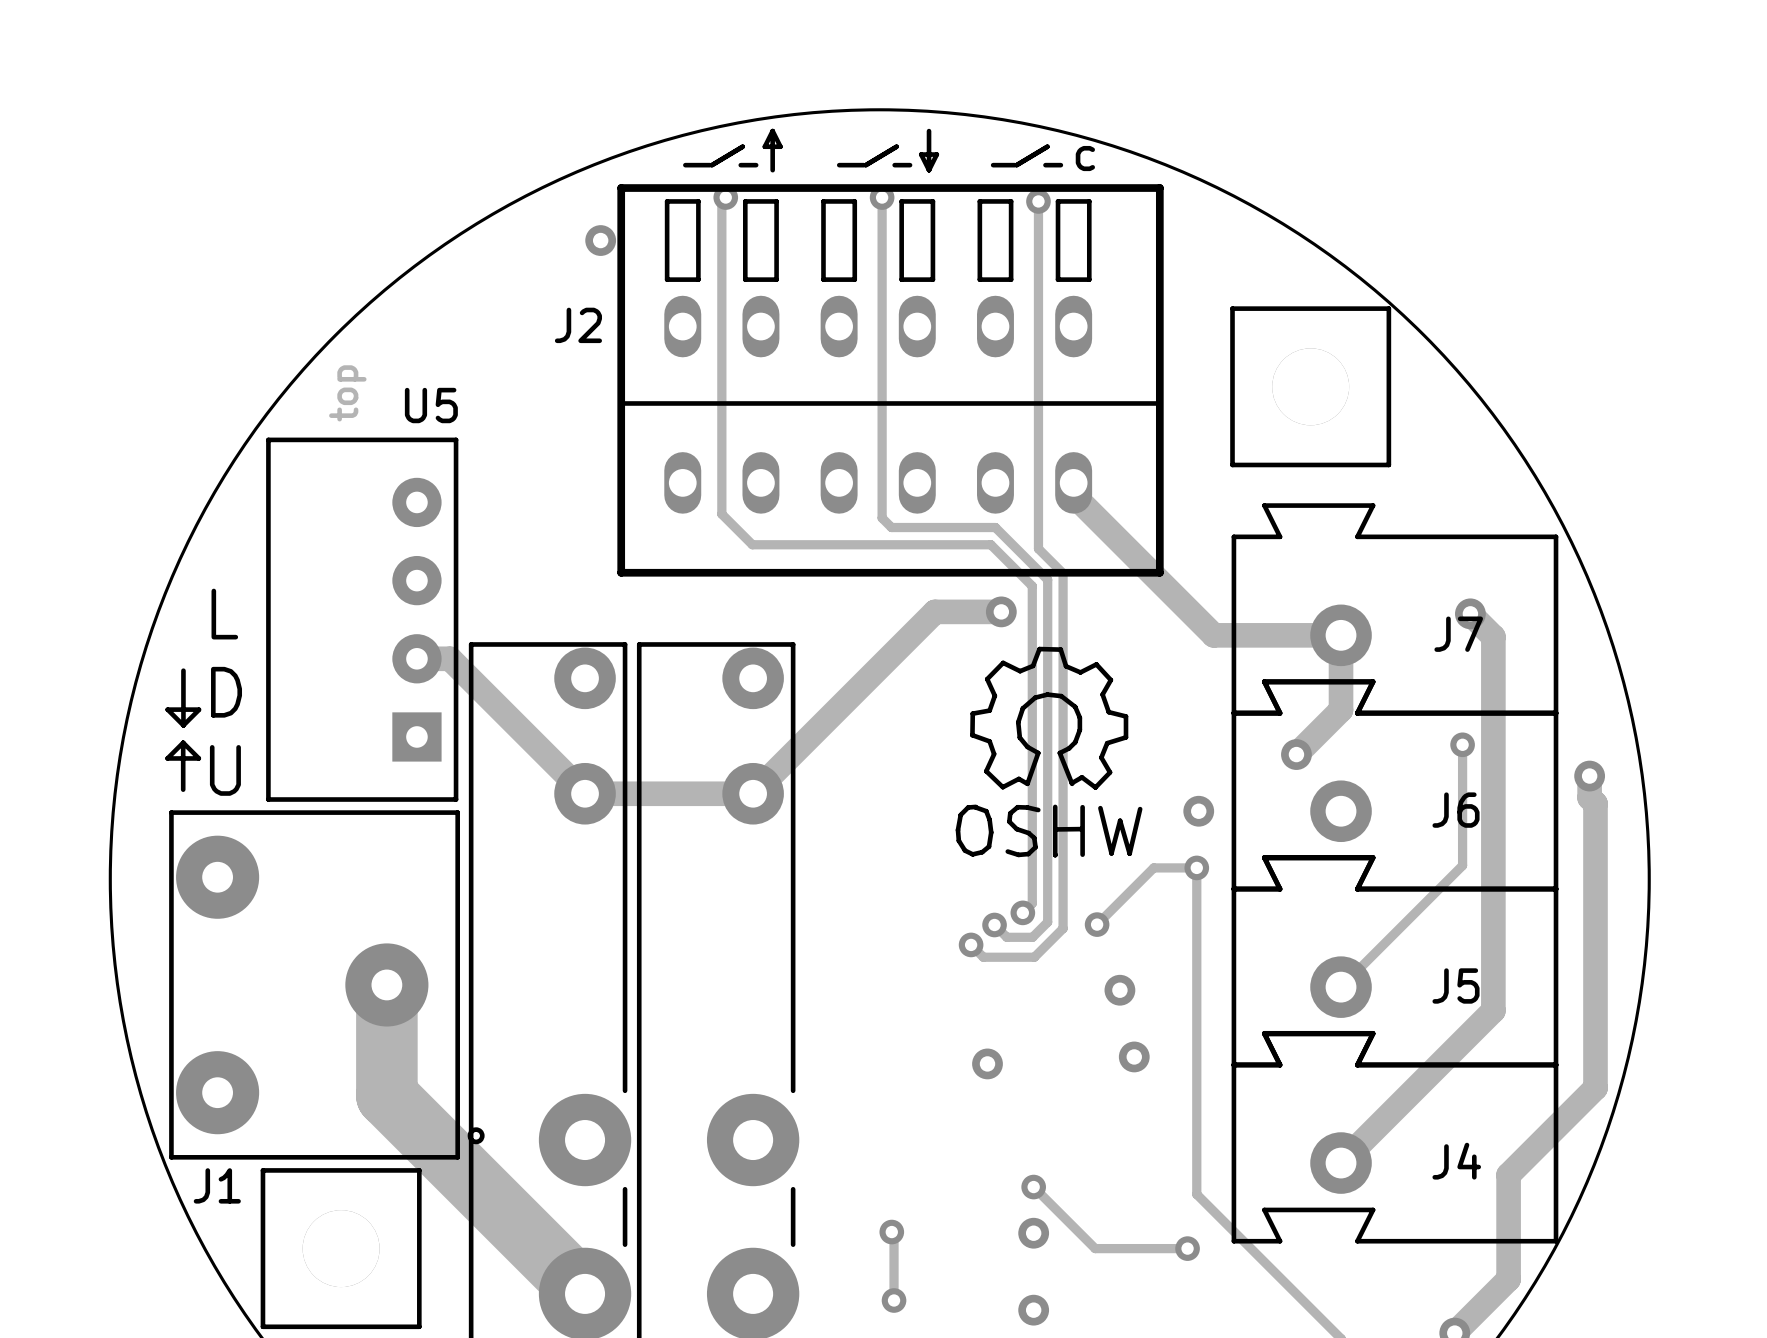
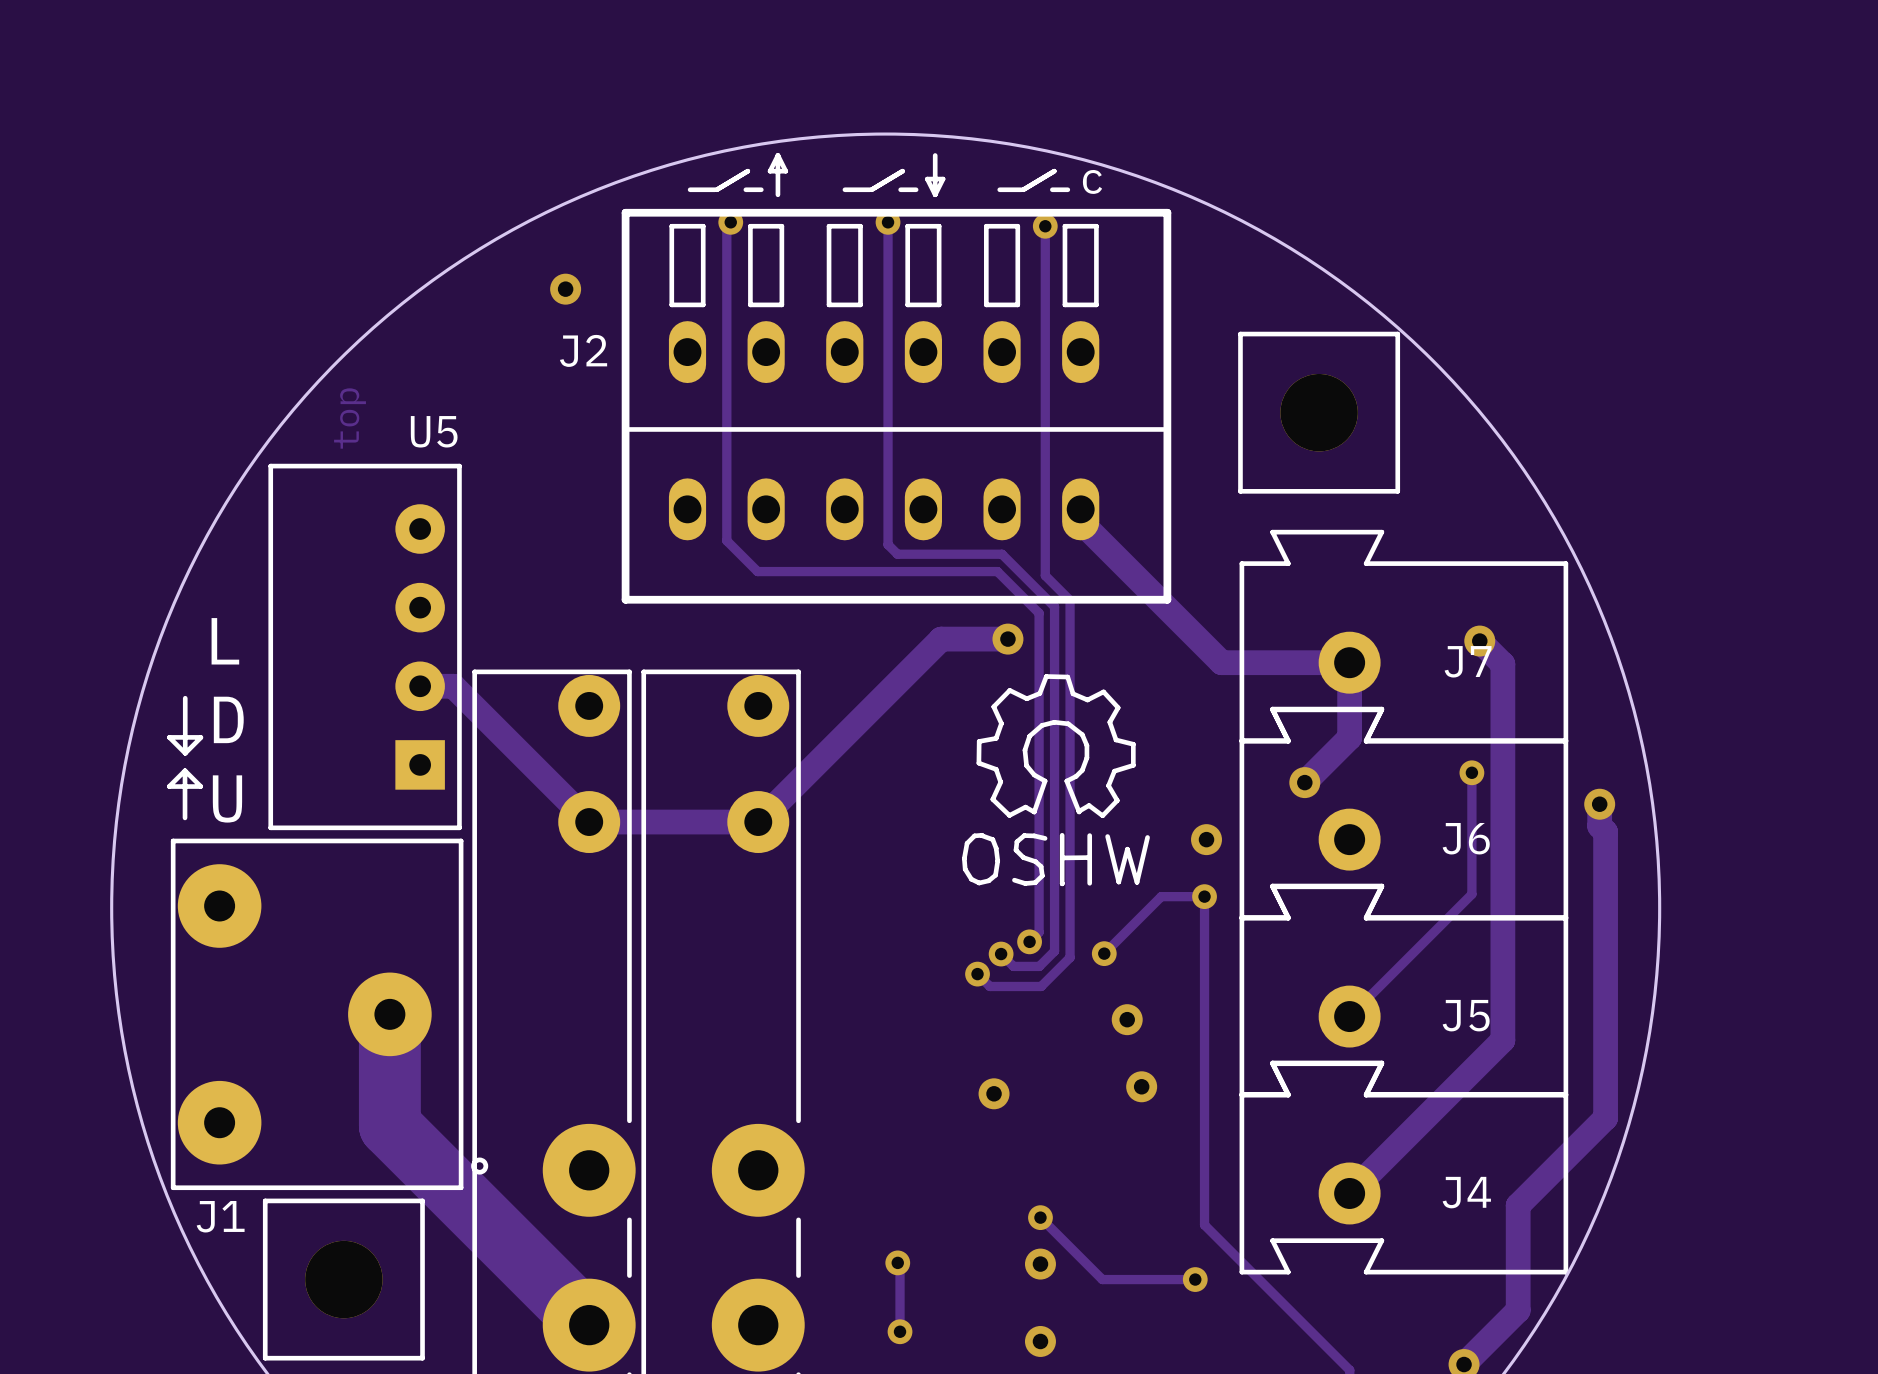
via position: (600, 240) -> (565, 289)

